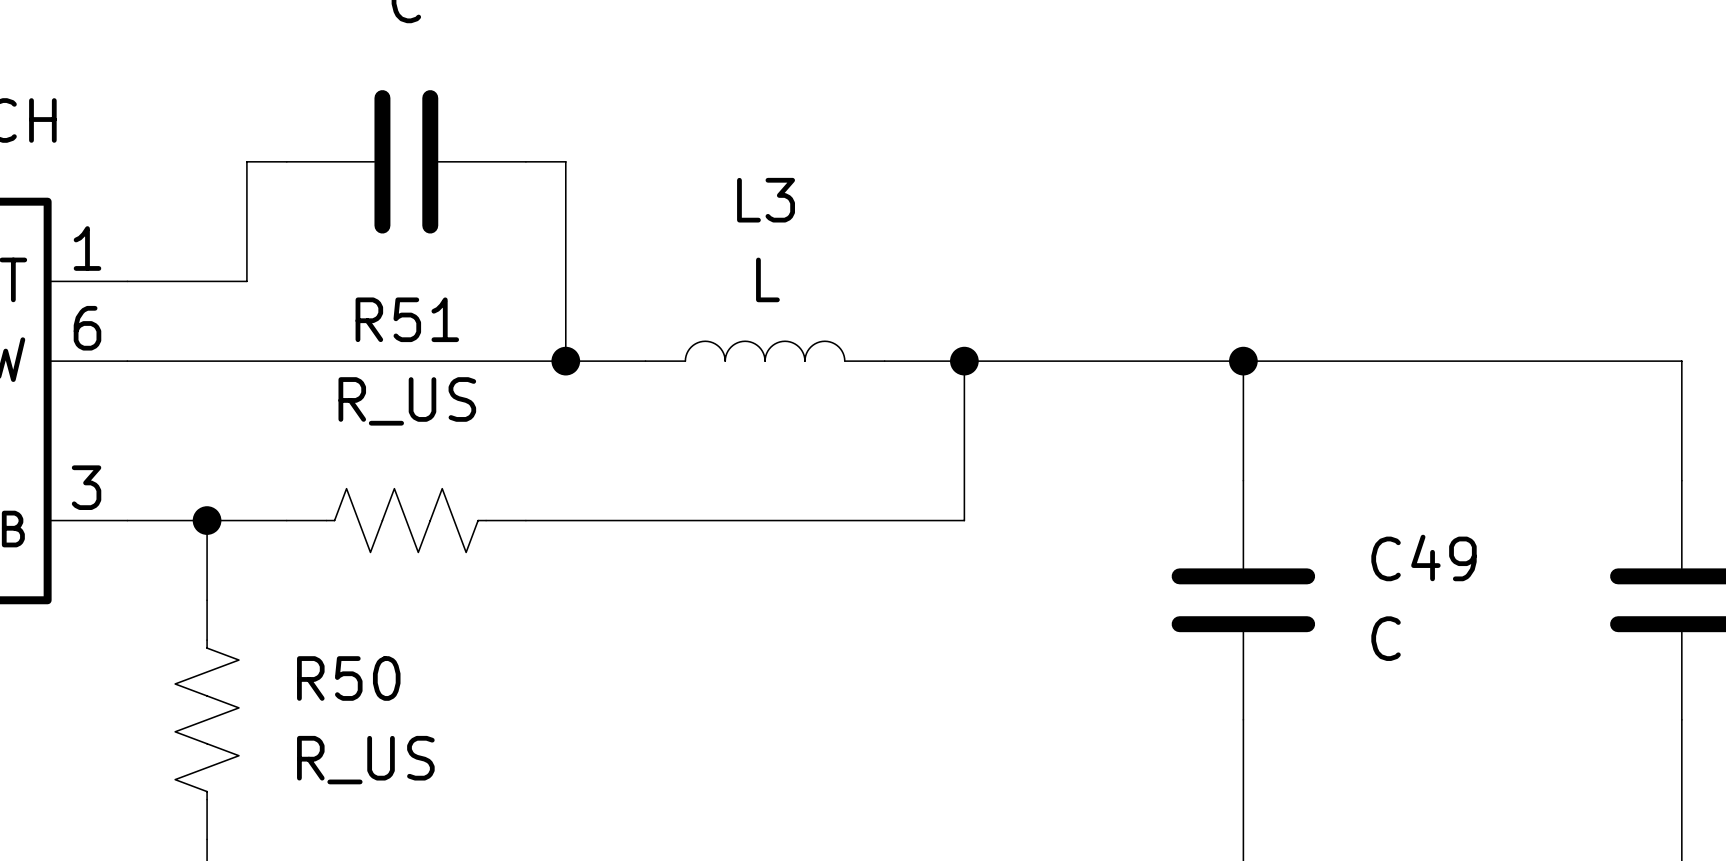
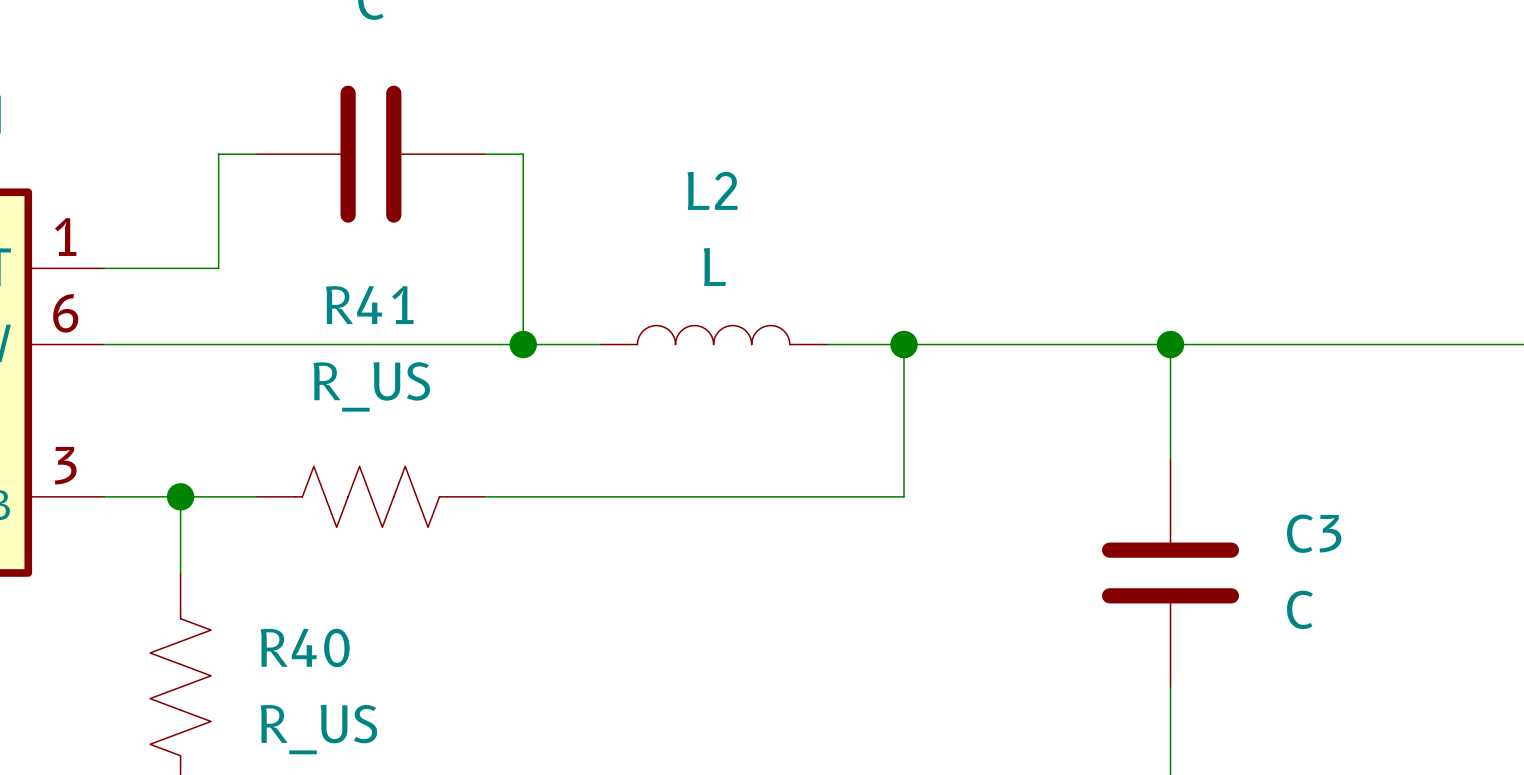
L3 name: L3 (766, 200) -> L2 (712, 190)
R51 name: R51 (407, 319) -> R41 (369, 305)
C49 name: C49 (1424, 557) -> C3 (1314, 533)
R50 name: R50 (348, 678) -> R40 (305, 647)

